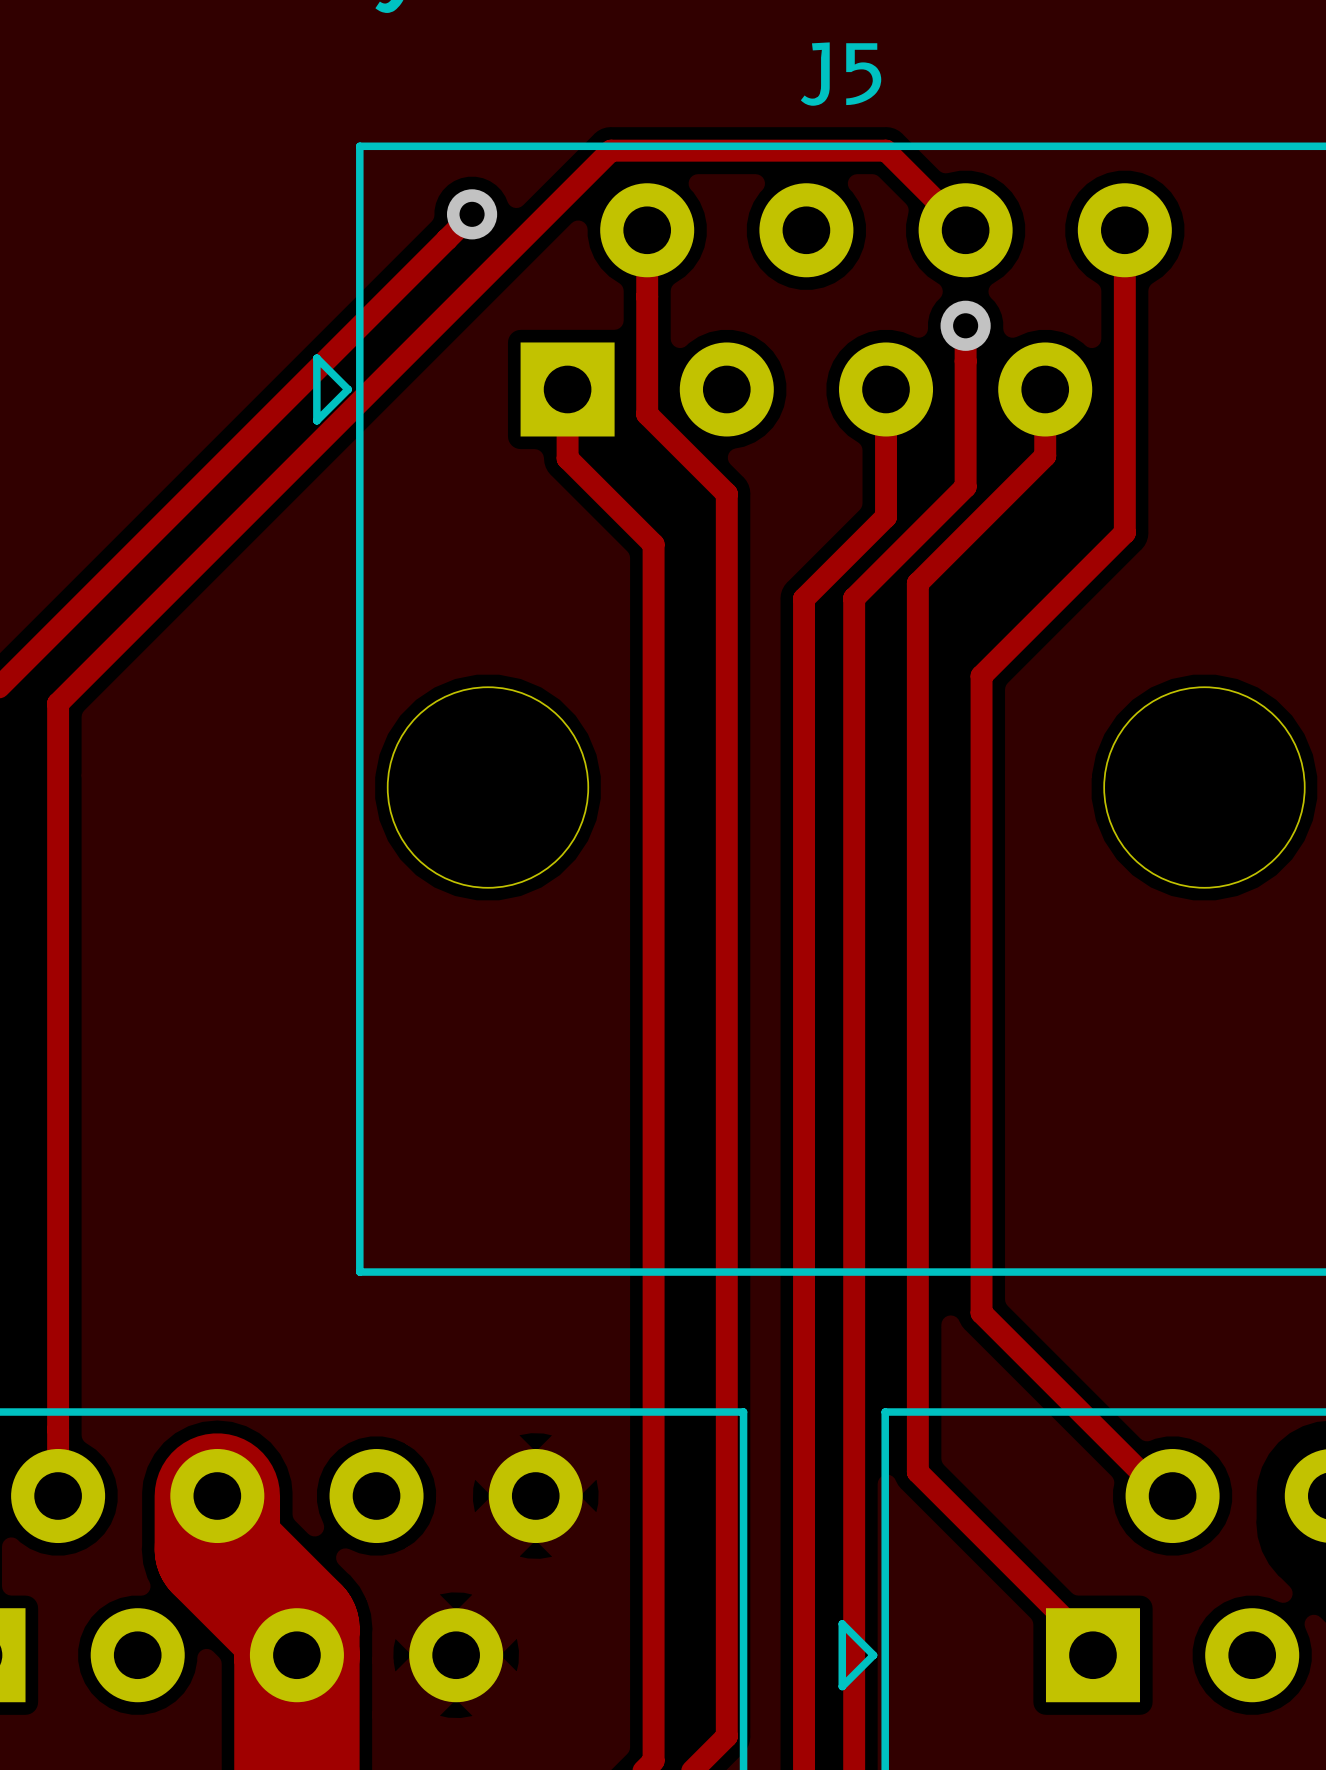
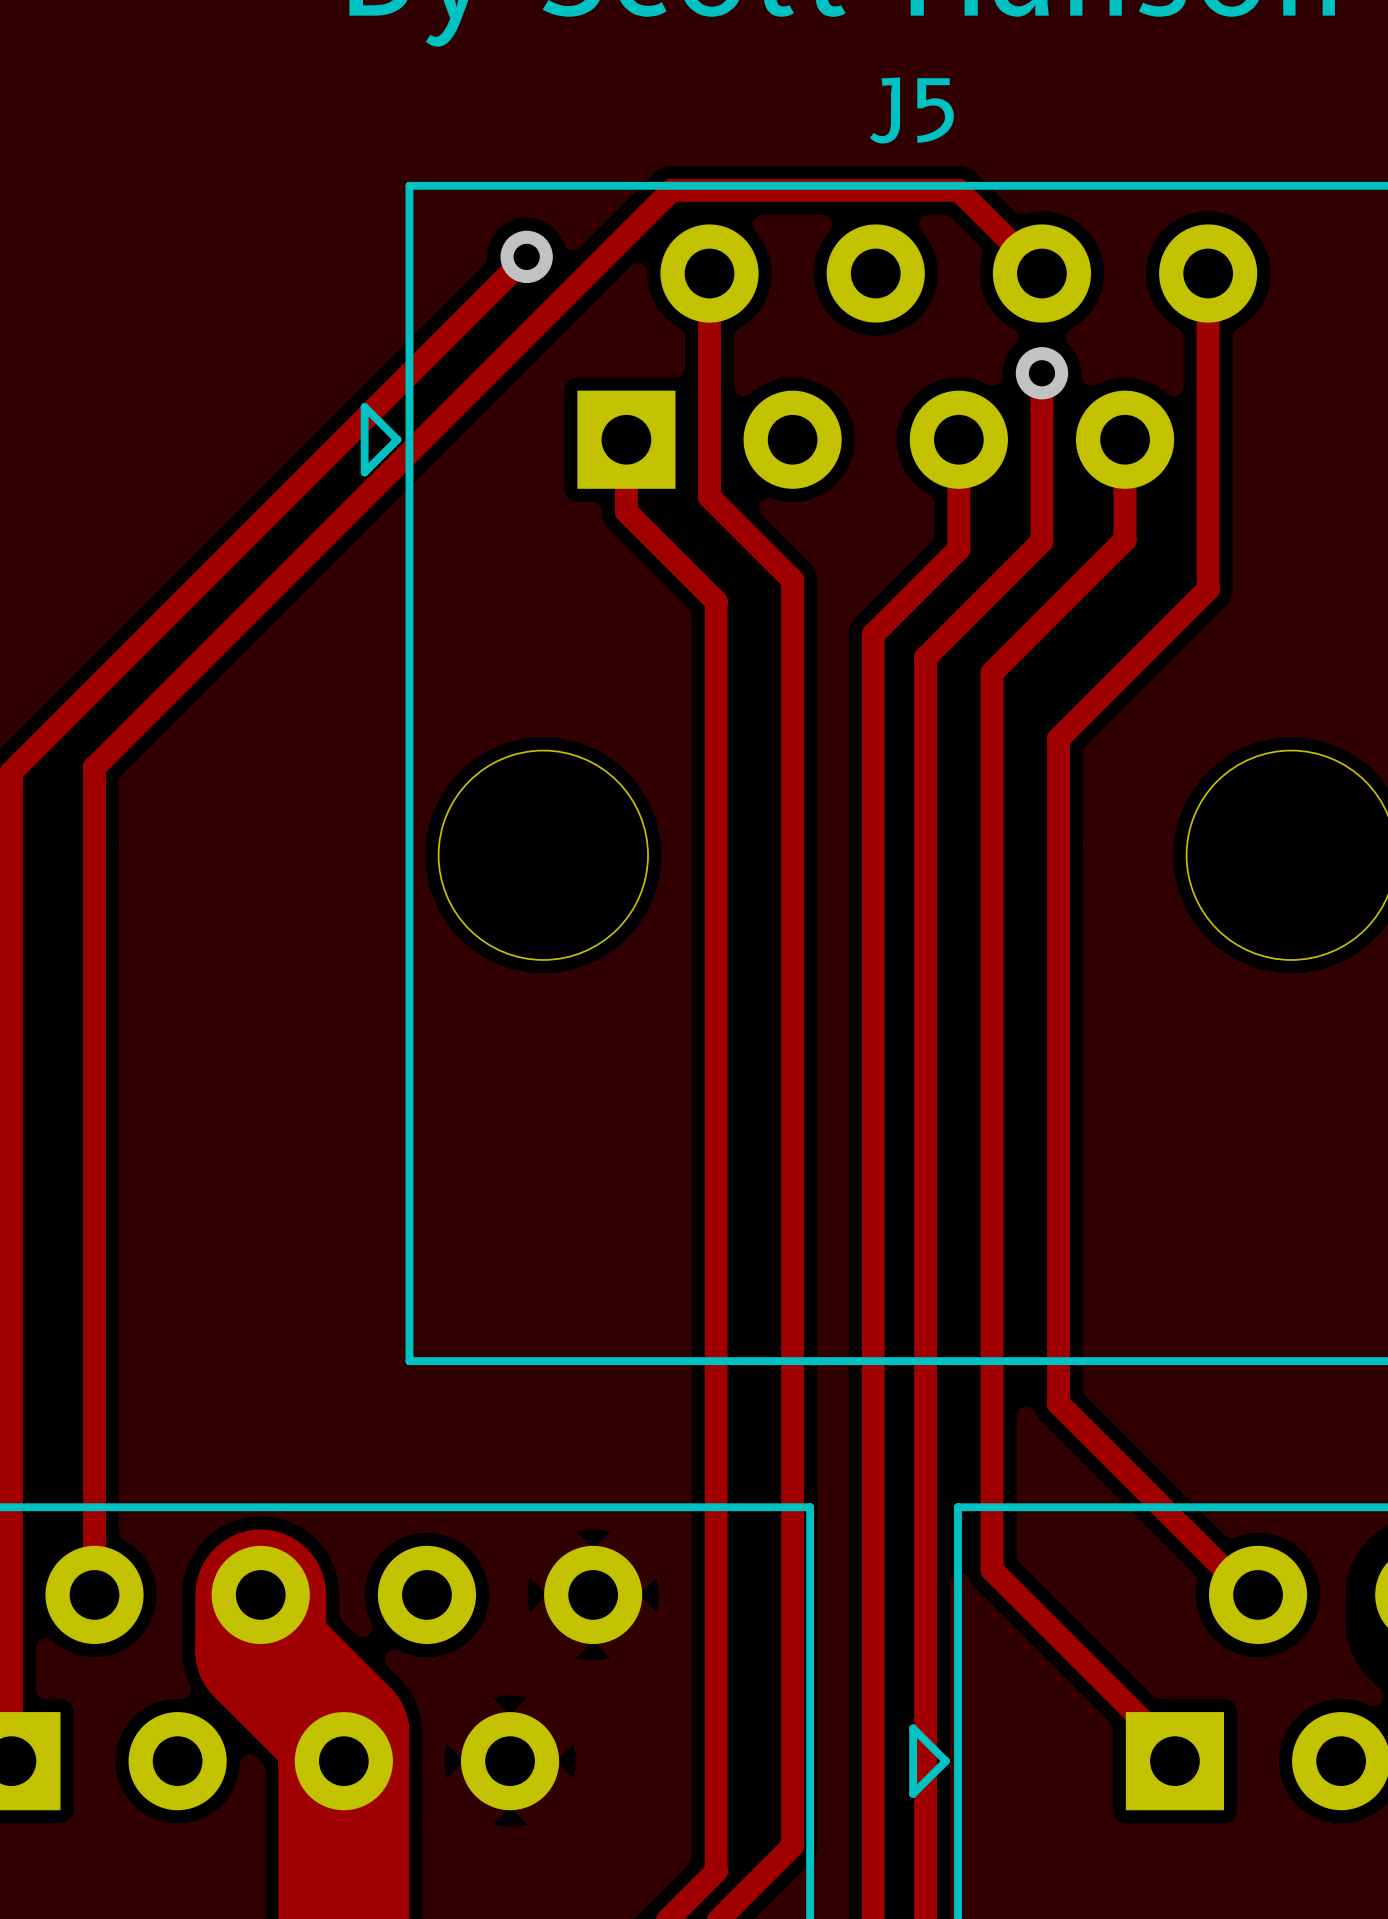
track: (647, 414) (726, 493) (726, 524) -> (709, 465) (709, 497) (792, 580)
track: (1045, 455) (917, 583) (917, 612) -> (1125, 509) (1125, 539) (992, 672)
track: (886, 494) (886, 516) (804, 598) -> (958, 549) (873, 634) (873, 658)

